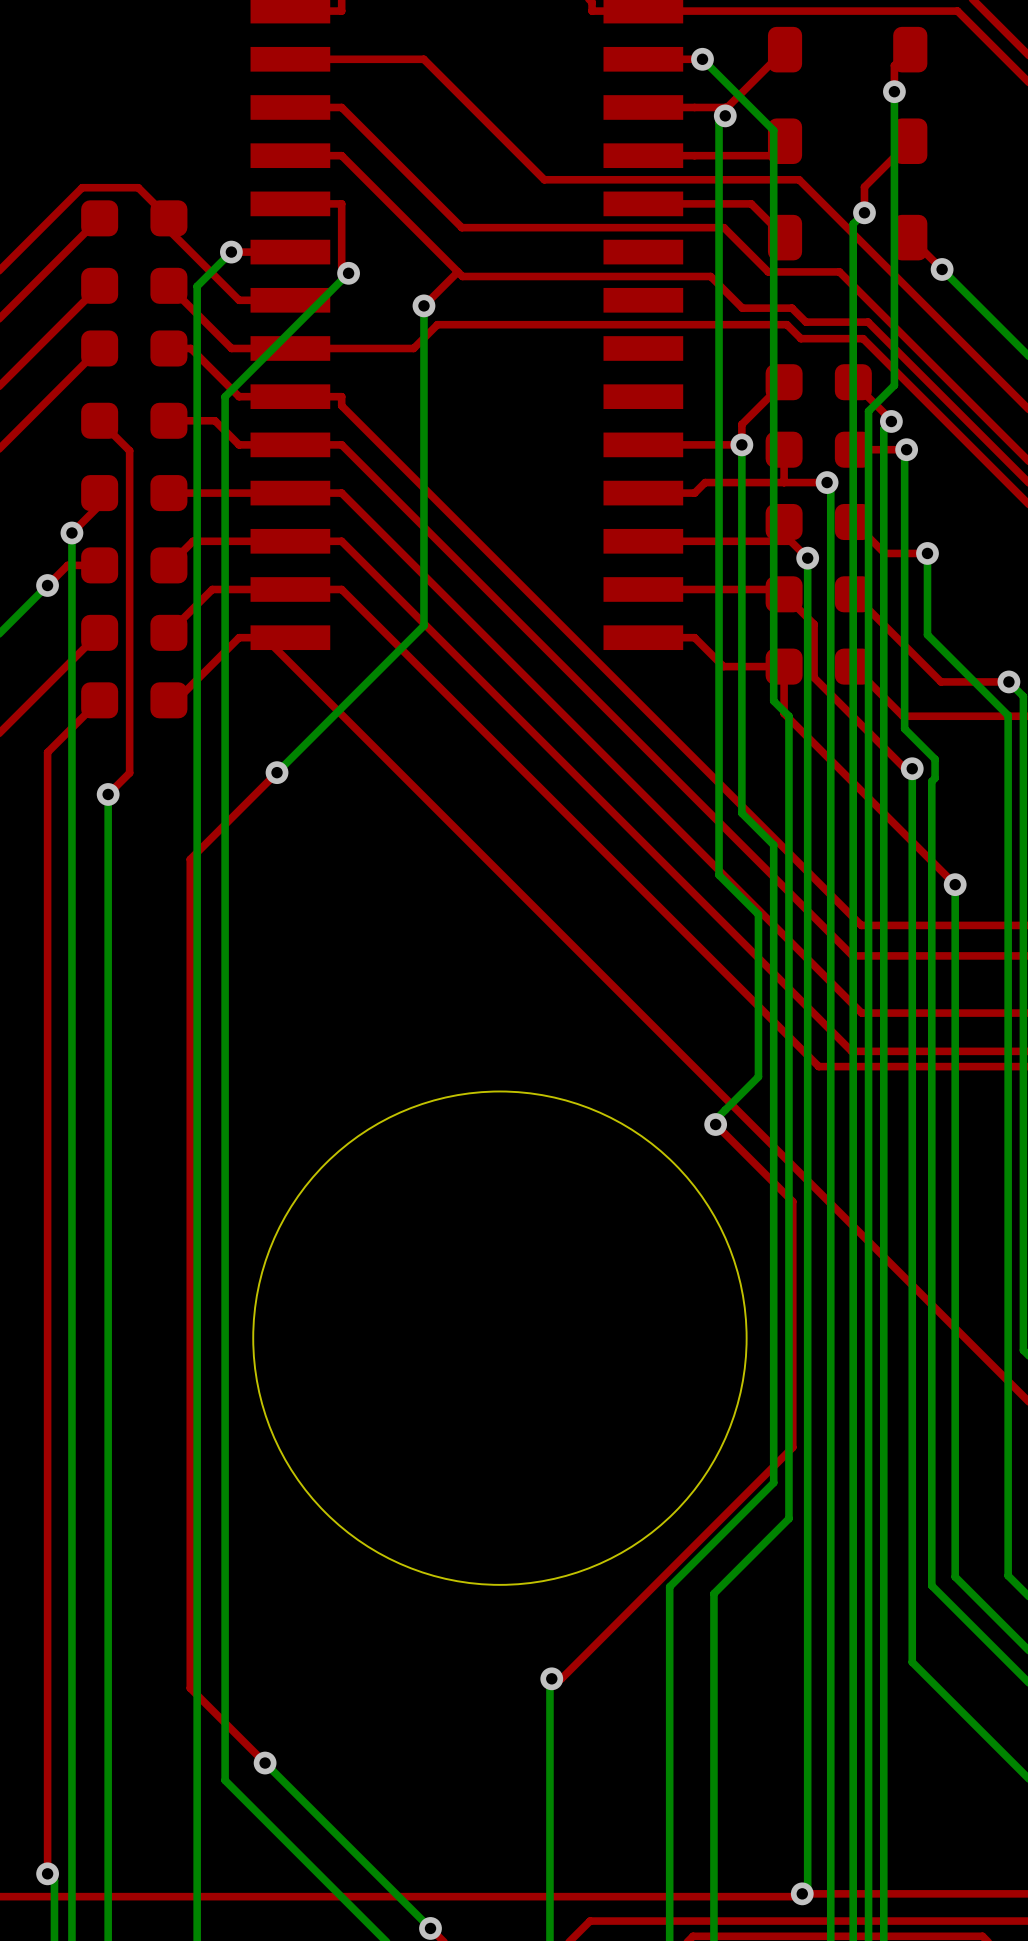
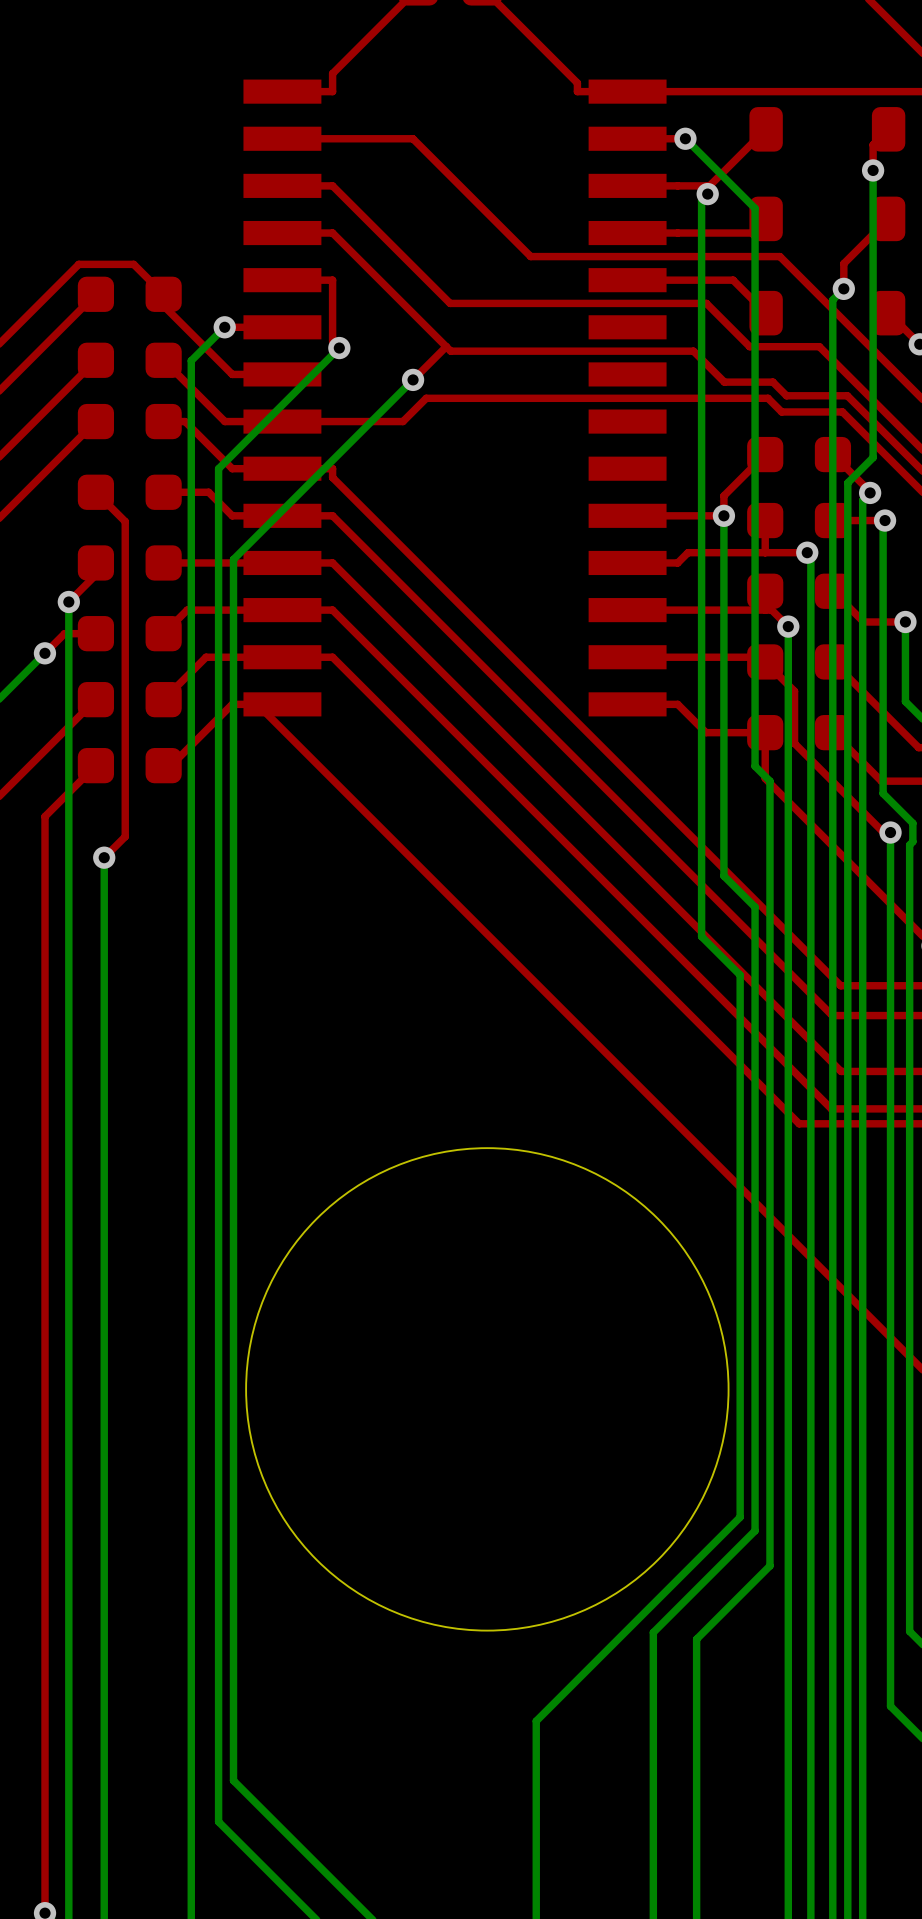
bottom track: (423, 305) (423, 625) (277, 772) -> (413, 379) (233, 559) (233, 1780) (257, 1804)
top track: (277, 772) (190, 859) (190, 1688) (265, 1763) -> none
via: (277, 772) -> none
bottom track: (758, 1076) (715, 1119) (715, 1124) -> (740, 1133) (740, 1517) (536, 1721)
top track: (715, 1124) (792, 1201) (792, 1447) (561, 1678) (551, 1678) -> none
via: (715, 1124) -> none
via: (551, 1678) -> none
via: (265, 1763) -> none

